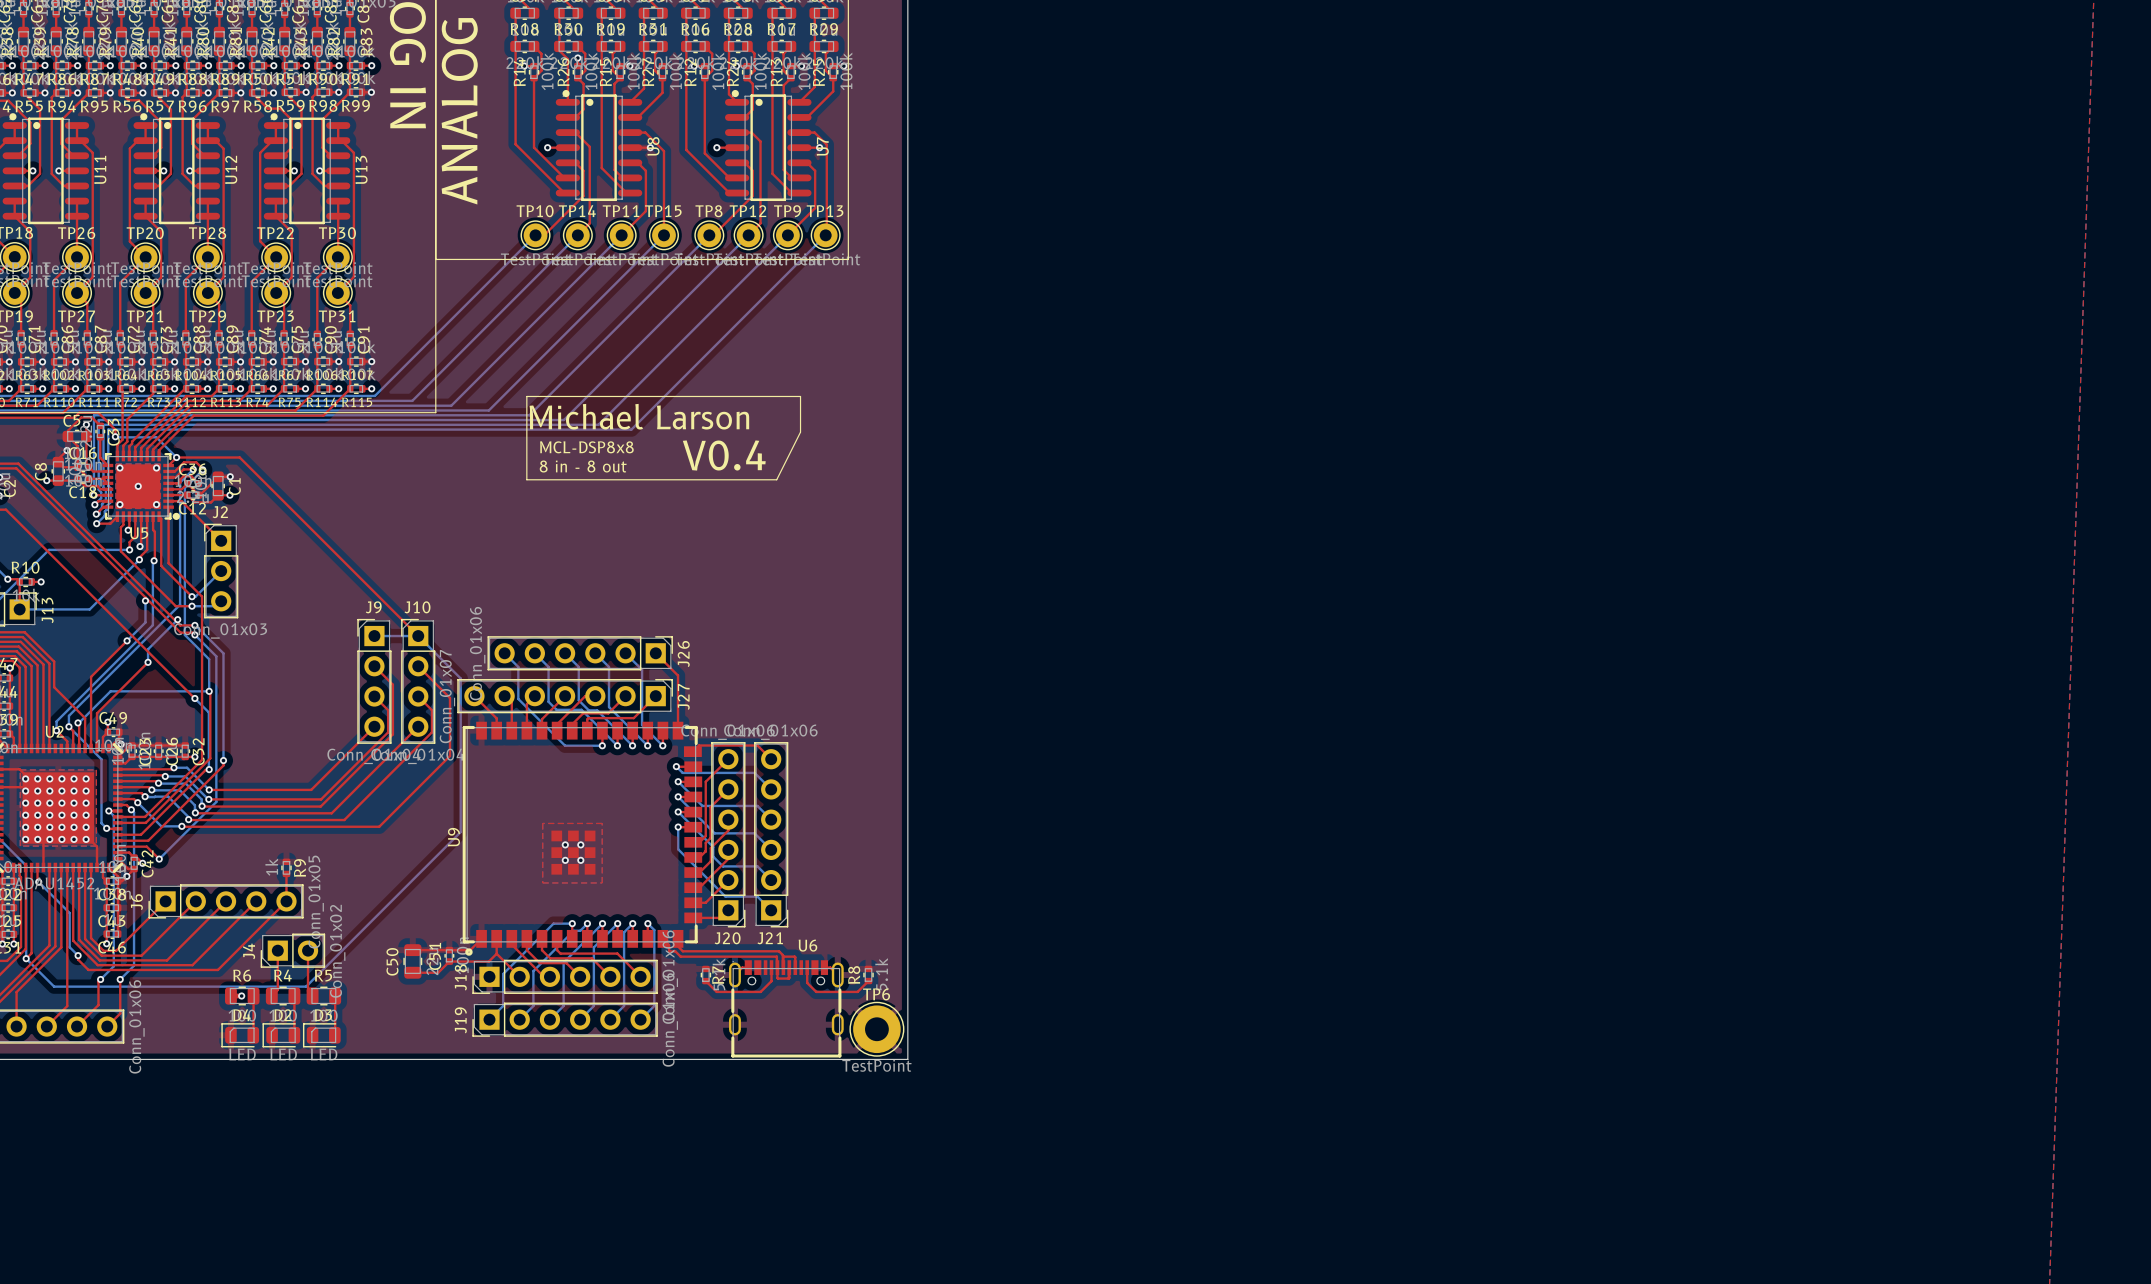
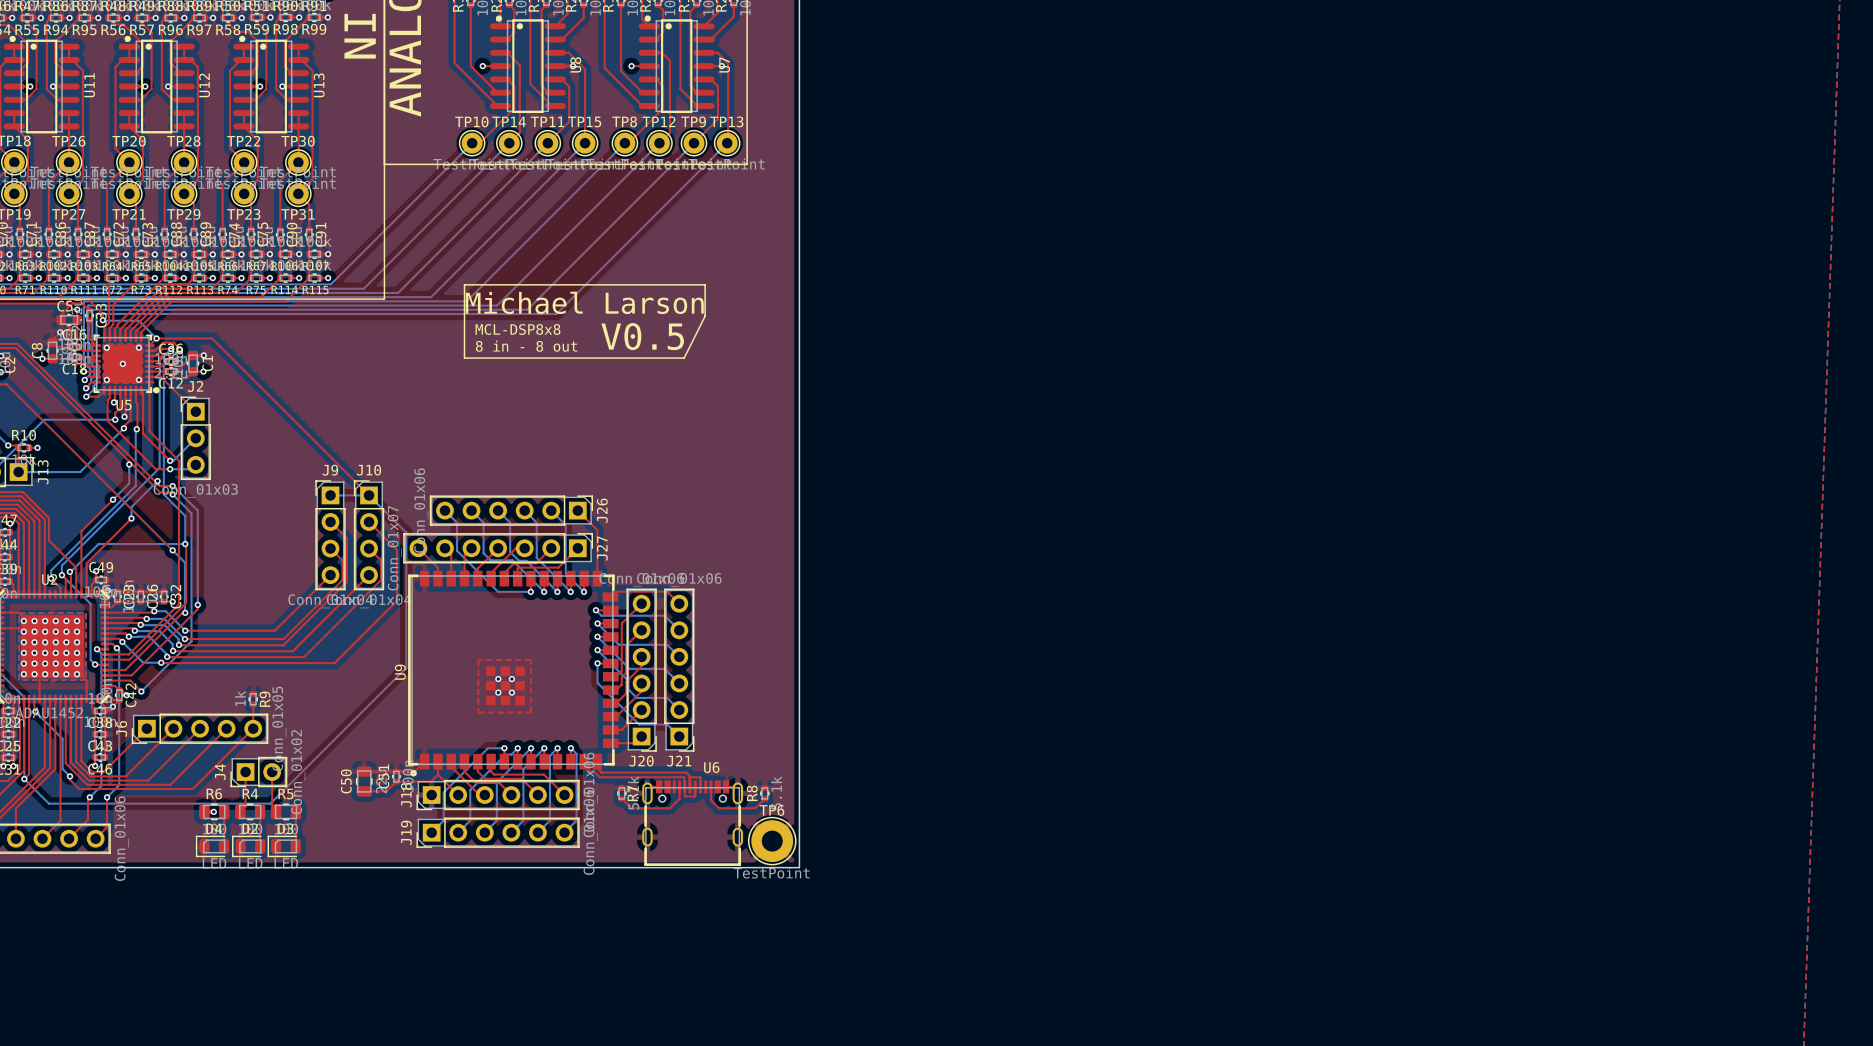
text: V0.4 (724, 455) -> V0.5 (642, 336)

